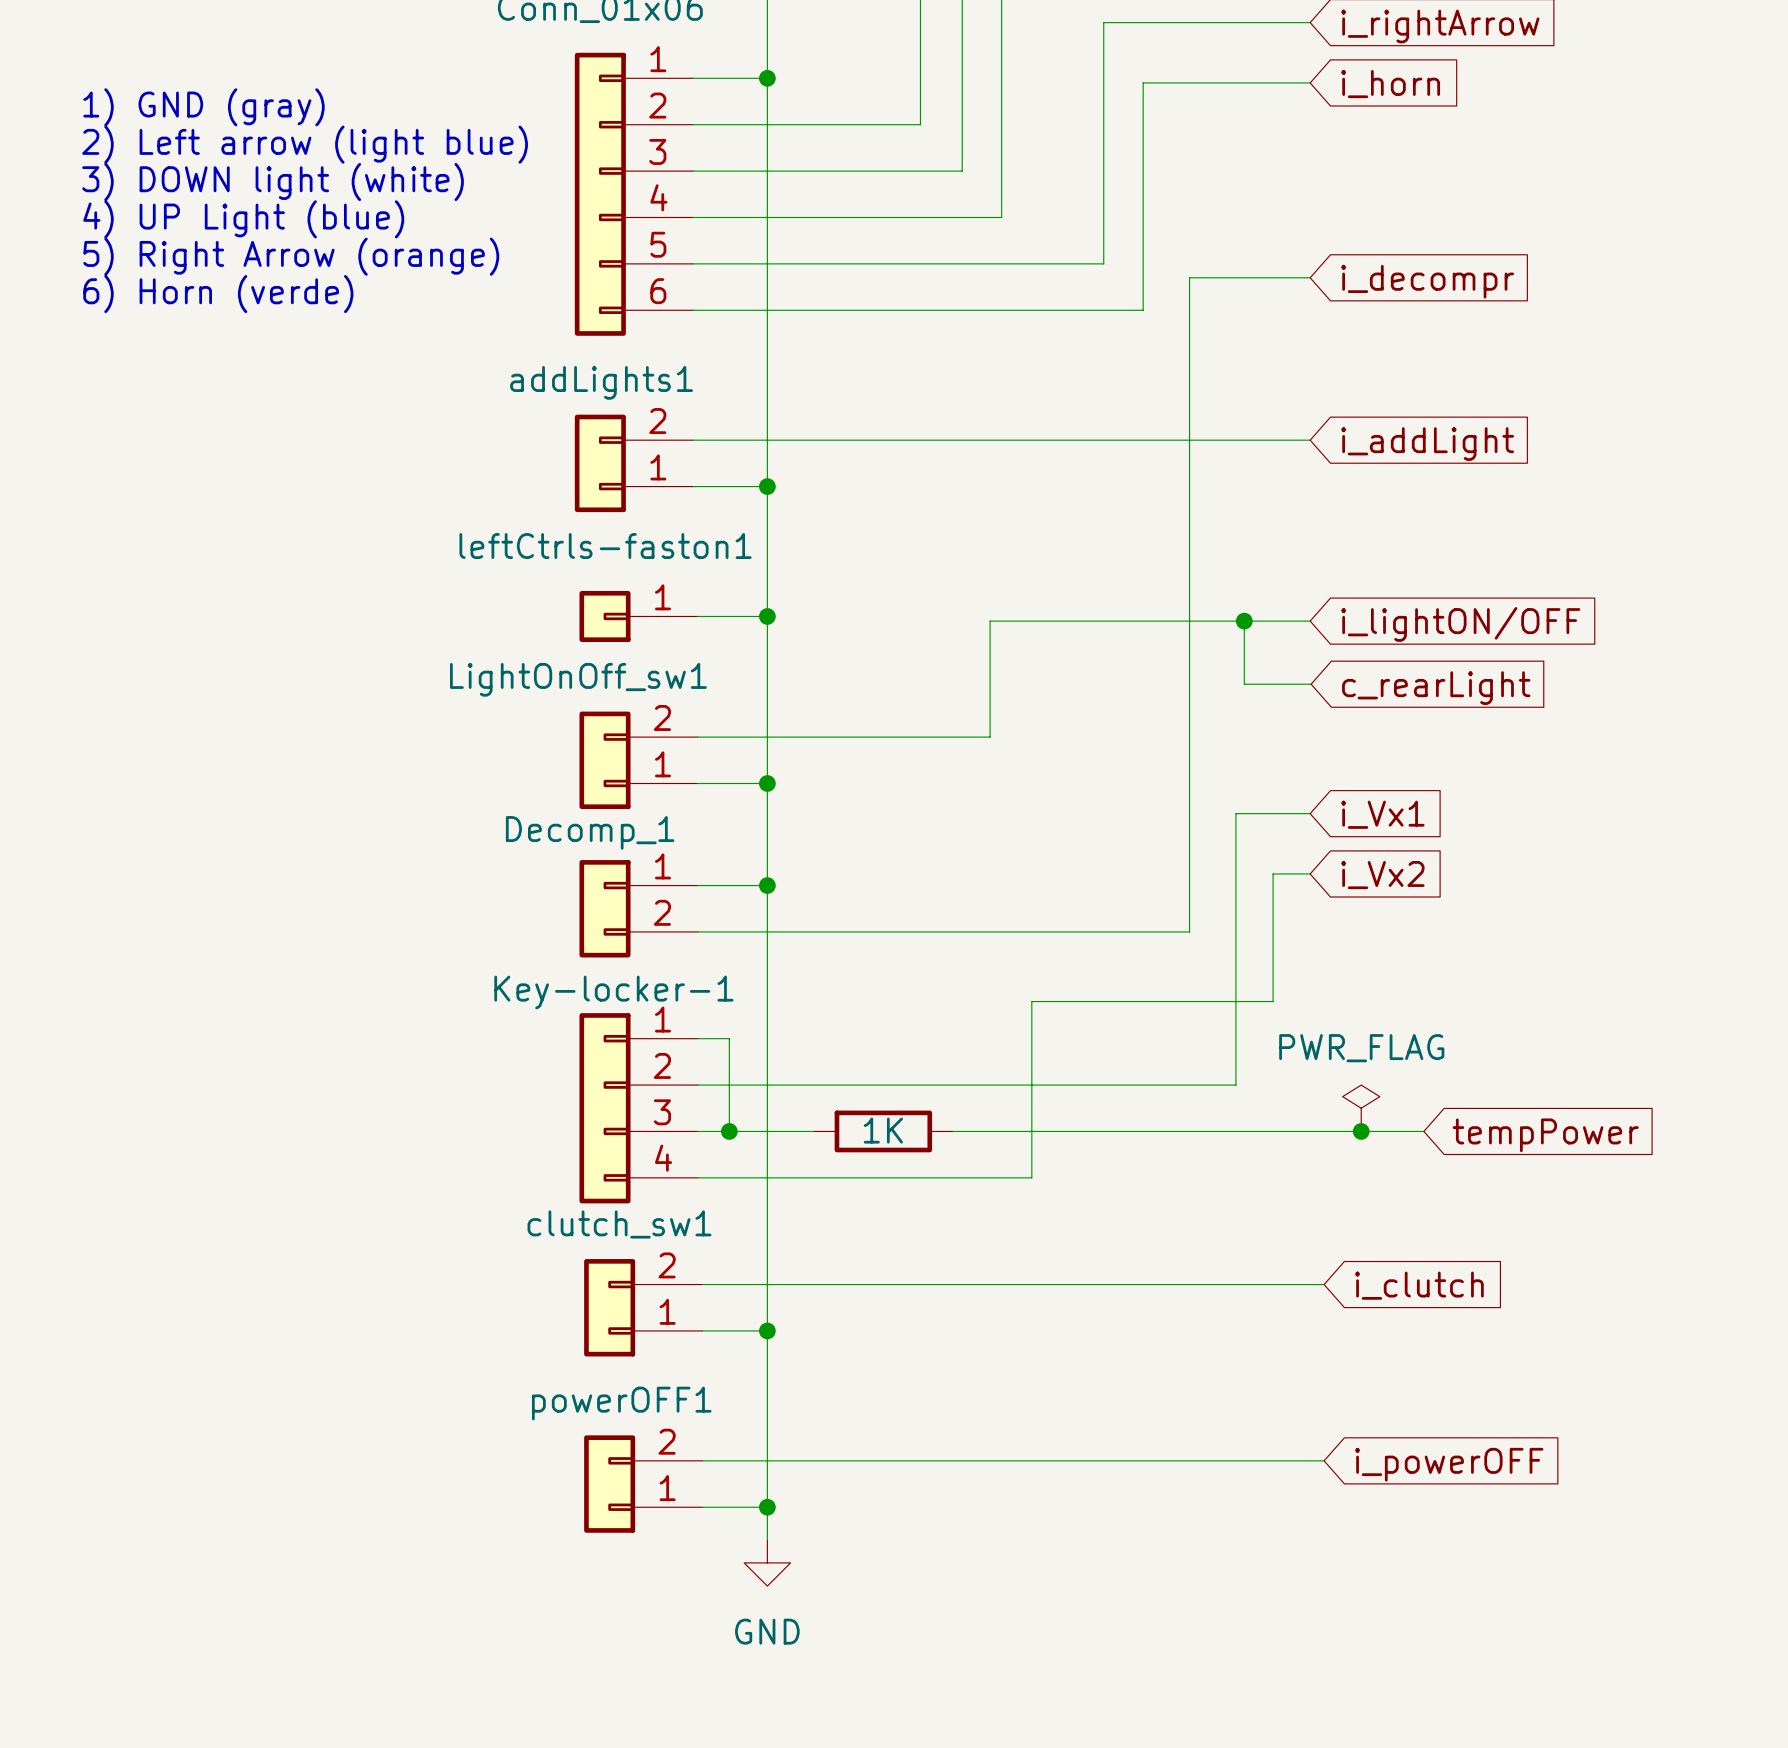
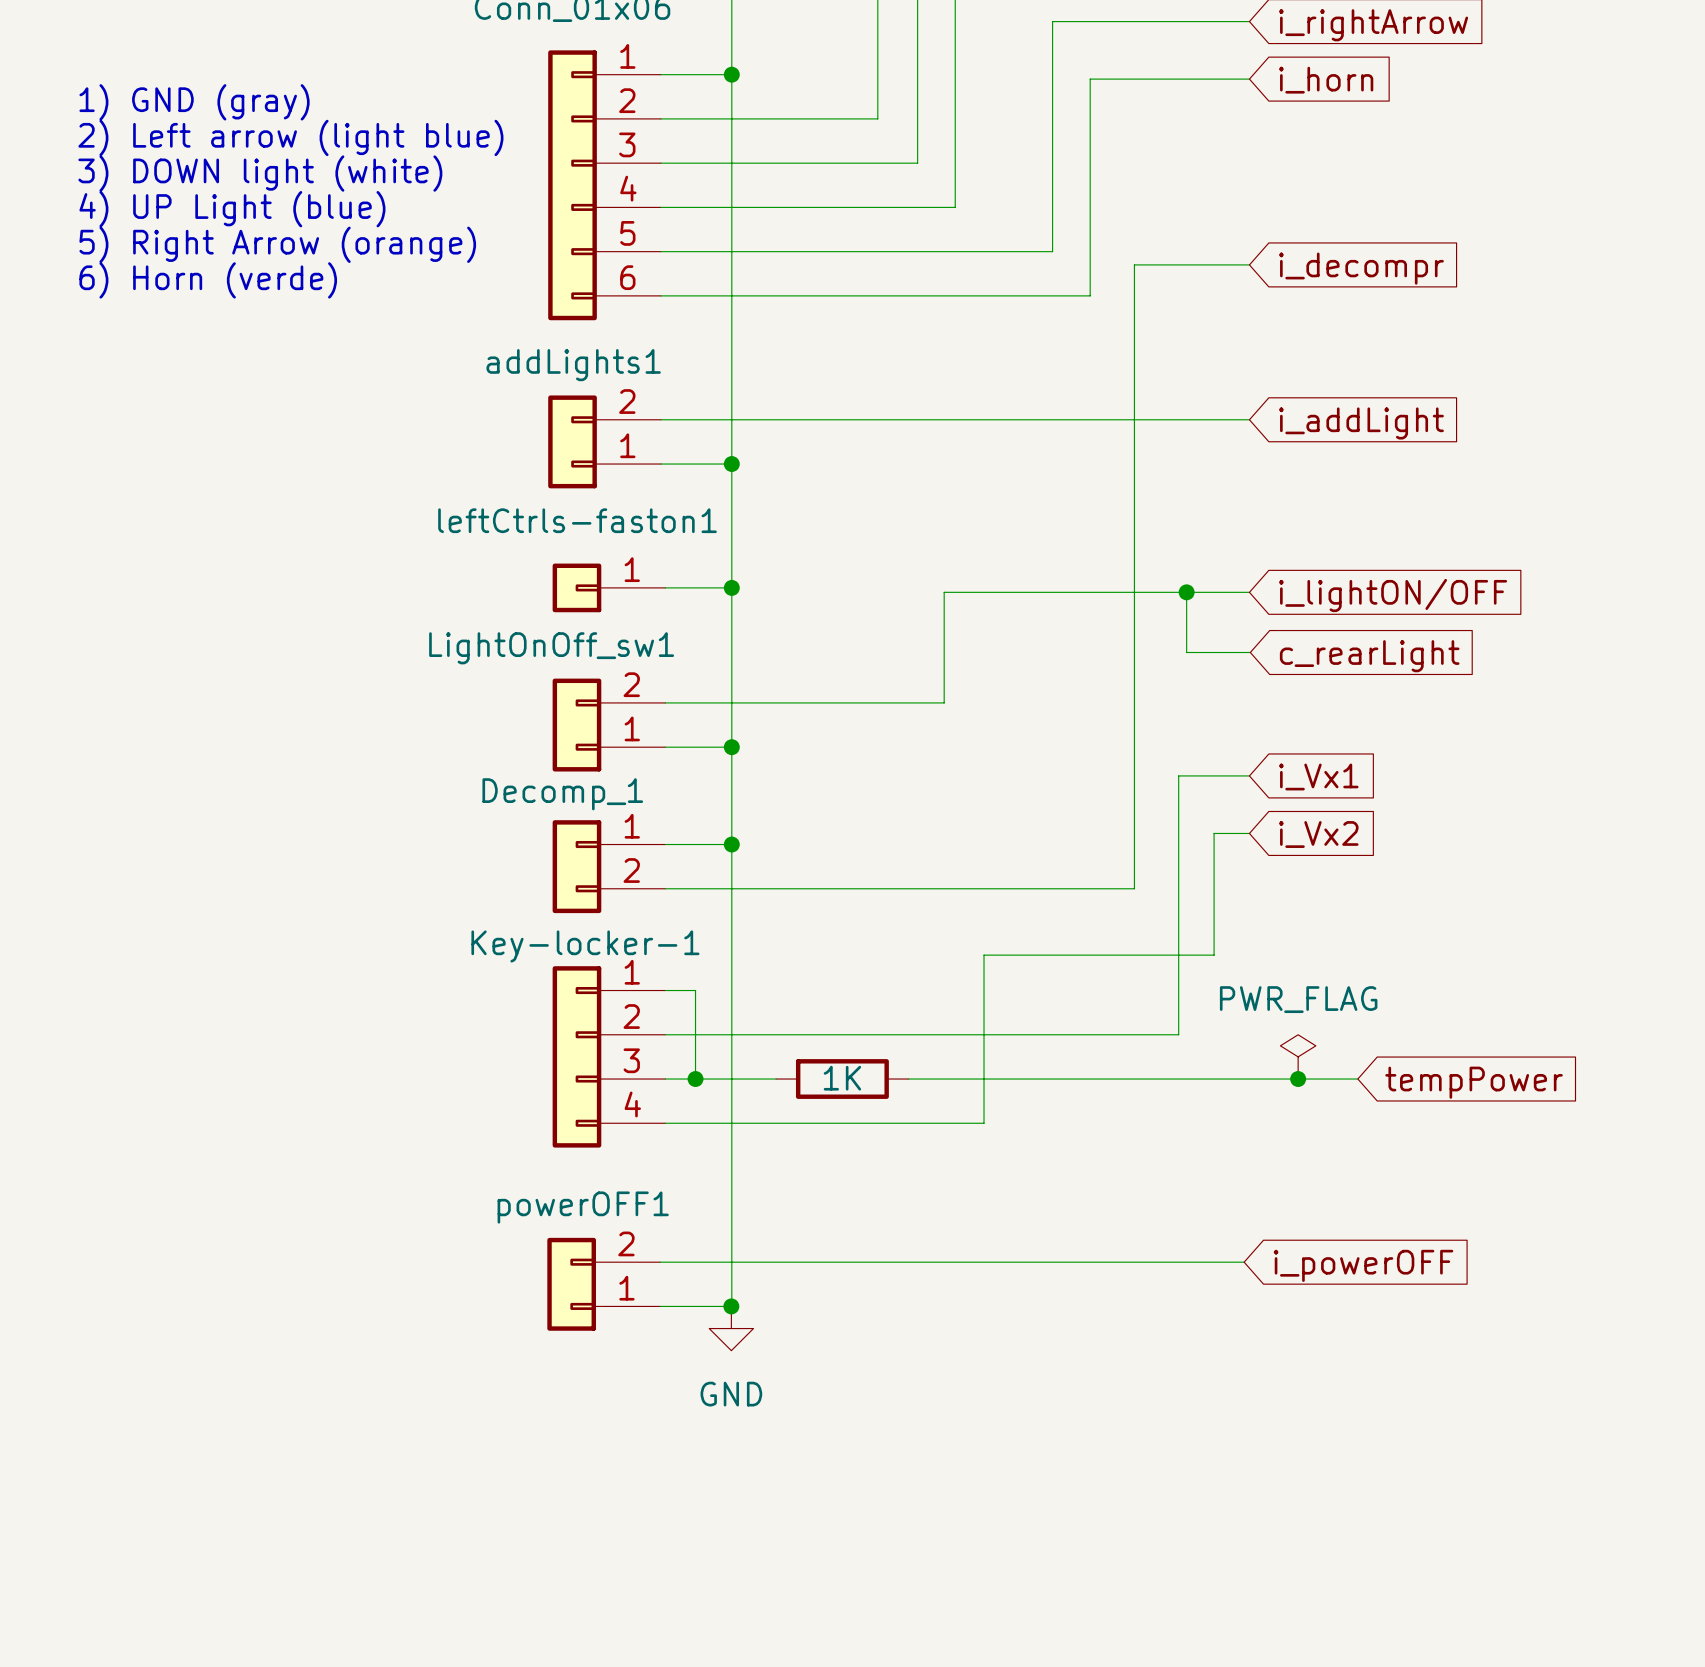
wire: (702, 1284) (1324, 1284) -> none
global label: i_clutch (1419, 1285) -> none
clutch_sw1: (643, 1307) -> none
wire: none -> (660, 1262) (1244, 1262)
wire: (702, 1330) (767, 1330) -> none
junction position: (767, 1330) -> (731, 1306)
wire: (767, 1369) (767, 1539) -> (731, 1306) (660, 1306)
wire: (702, 1460) (1324, 1460) -> none
global label position: i_powerOFF (1449, 1464) -> i_powerOFF (1363, 1265)
powerOFF1 position: (643, 1484) -> (603, 1284)
wire: (702, 1507) (767, 1507) -> none
junction: (767, 1507) -> none
power symbol position: GND (767, 1562) -> GND (731, 1328)

